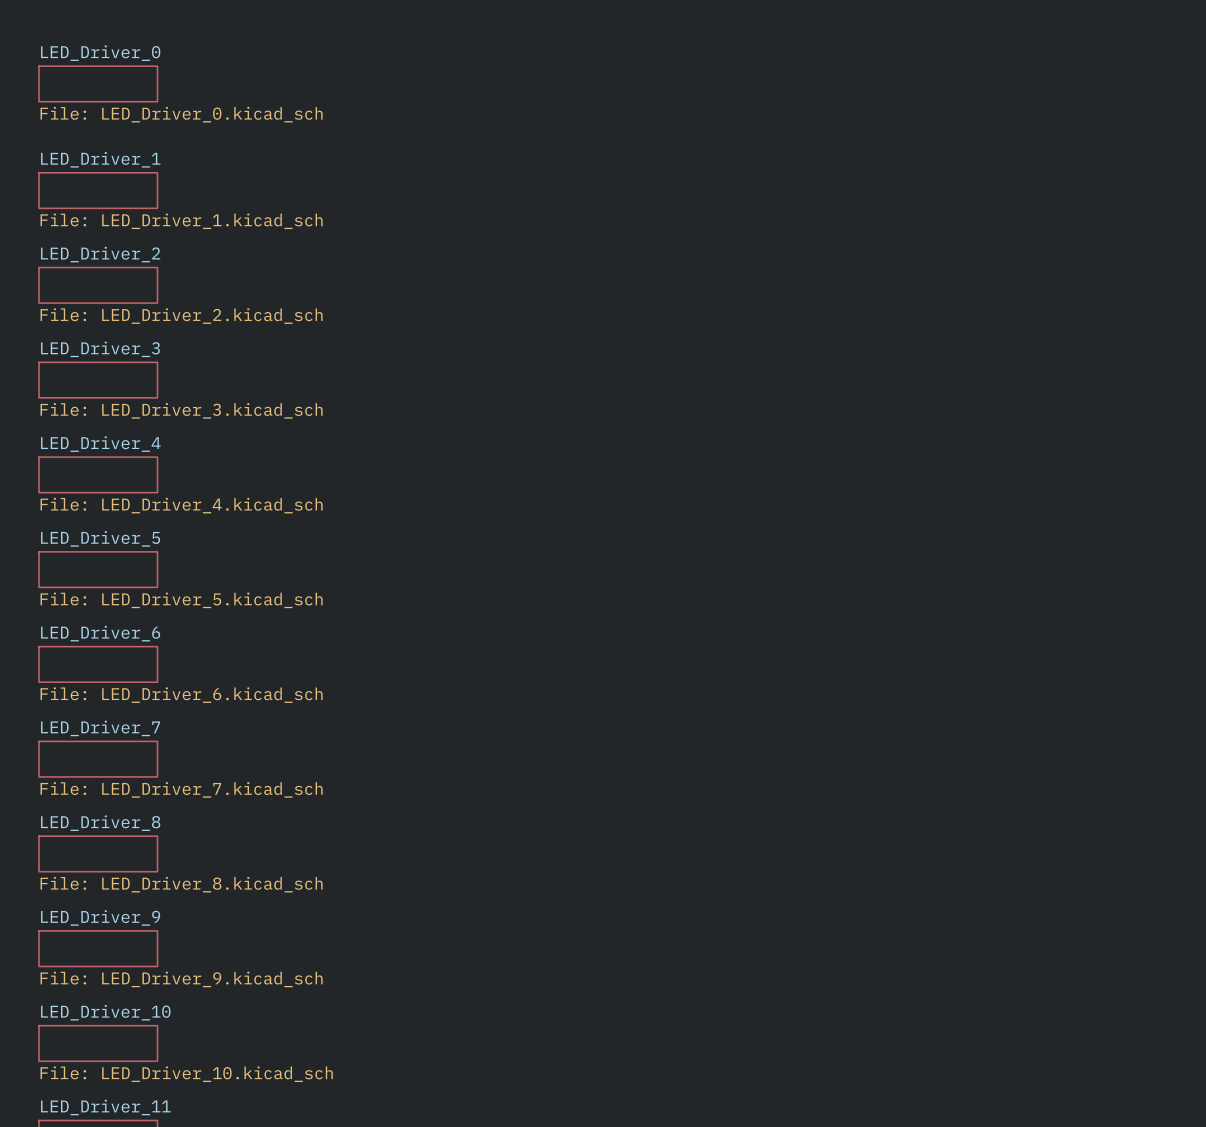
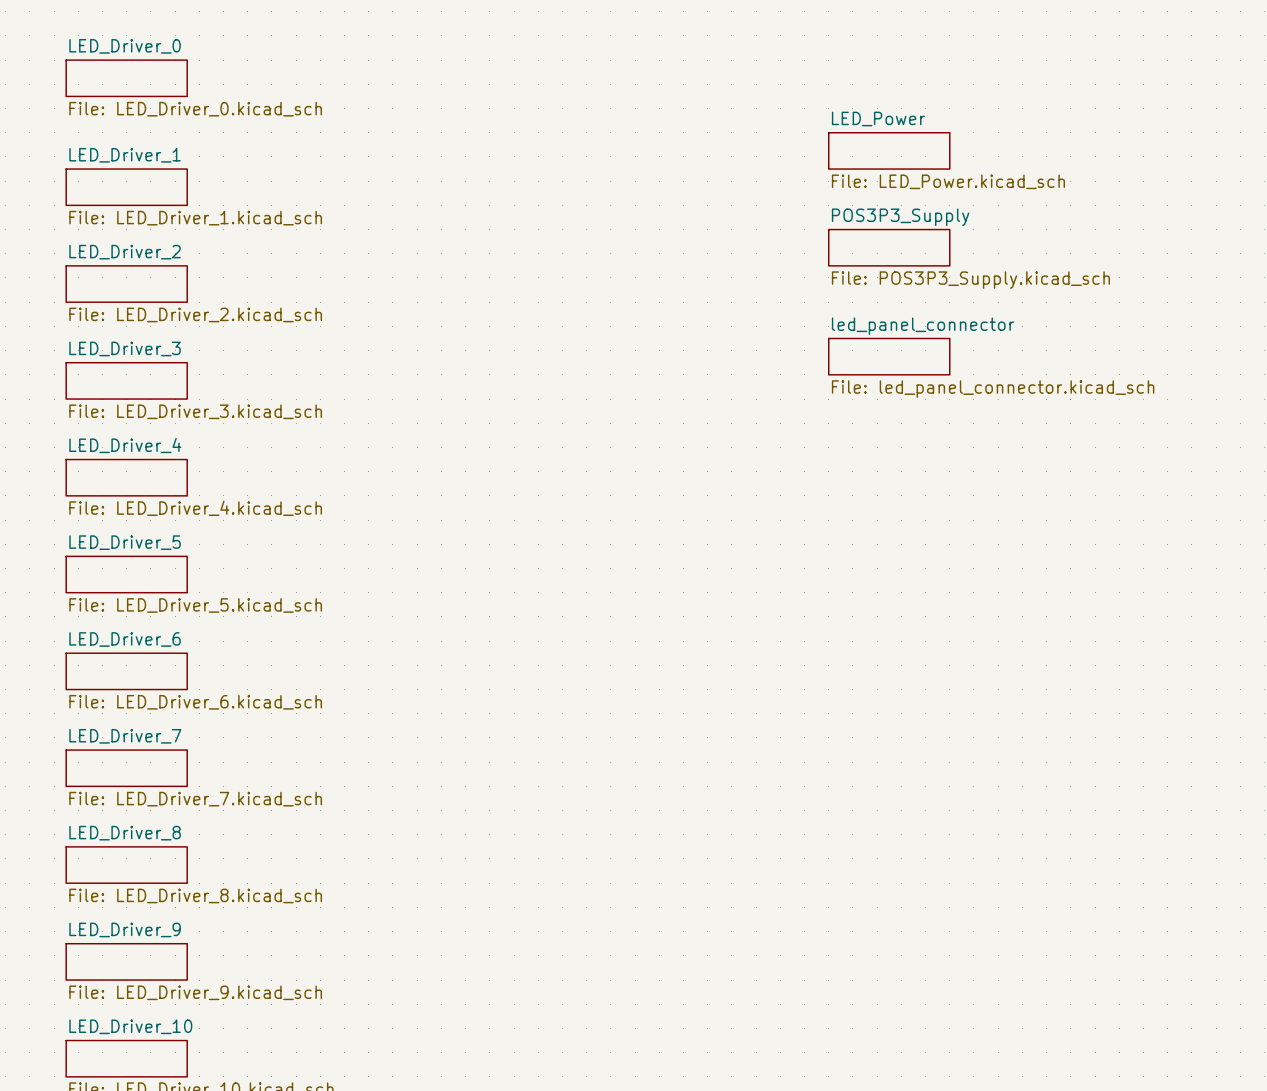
sheet LED_Power: none -> File: LED_Power.kicad_sch (889, 150)
sheet POS3P3_Supply: none -> File: POS3P3_Supply.kicad_sch (889, 247)
sheet led_panel_connector: none -> File: led_panel_connector.kicad_sch (889, 356)

